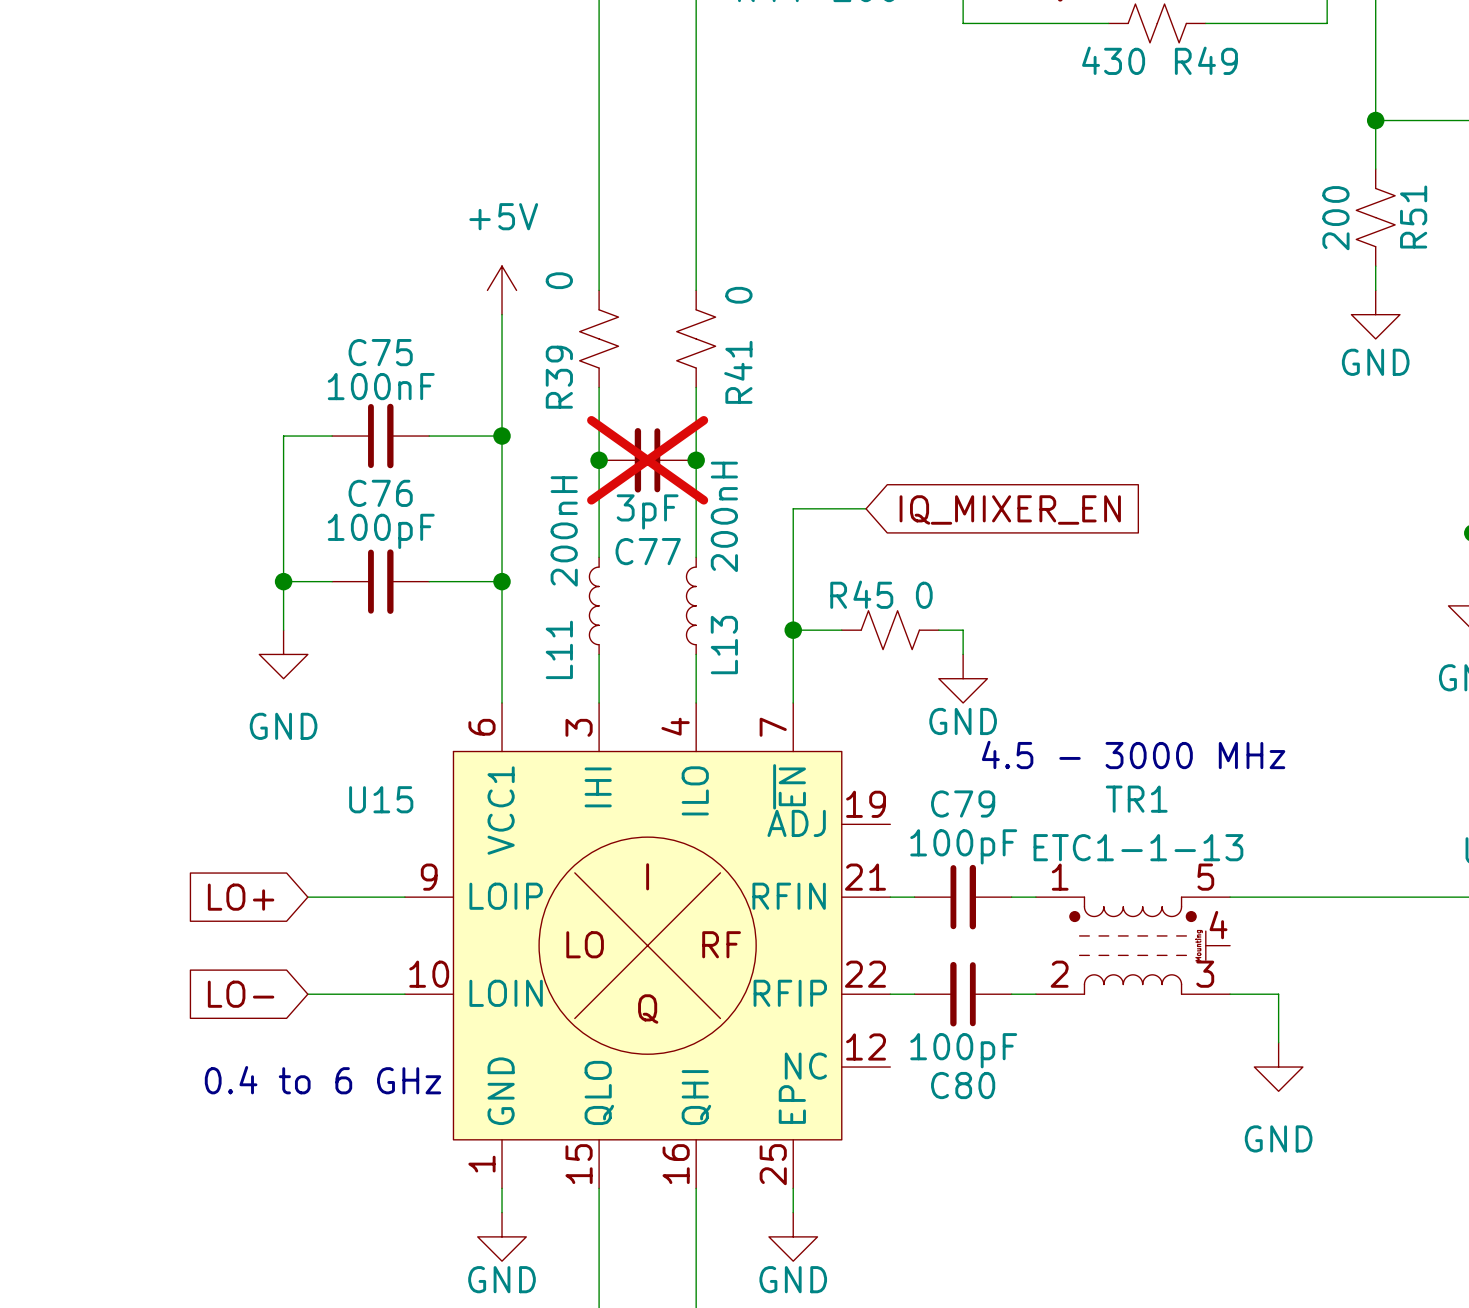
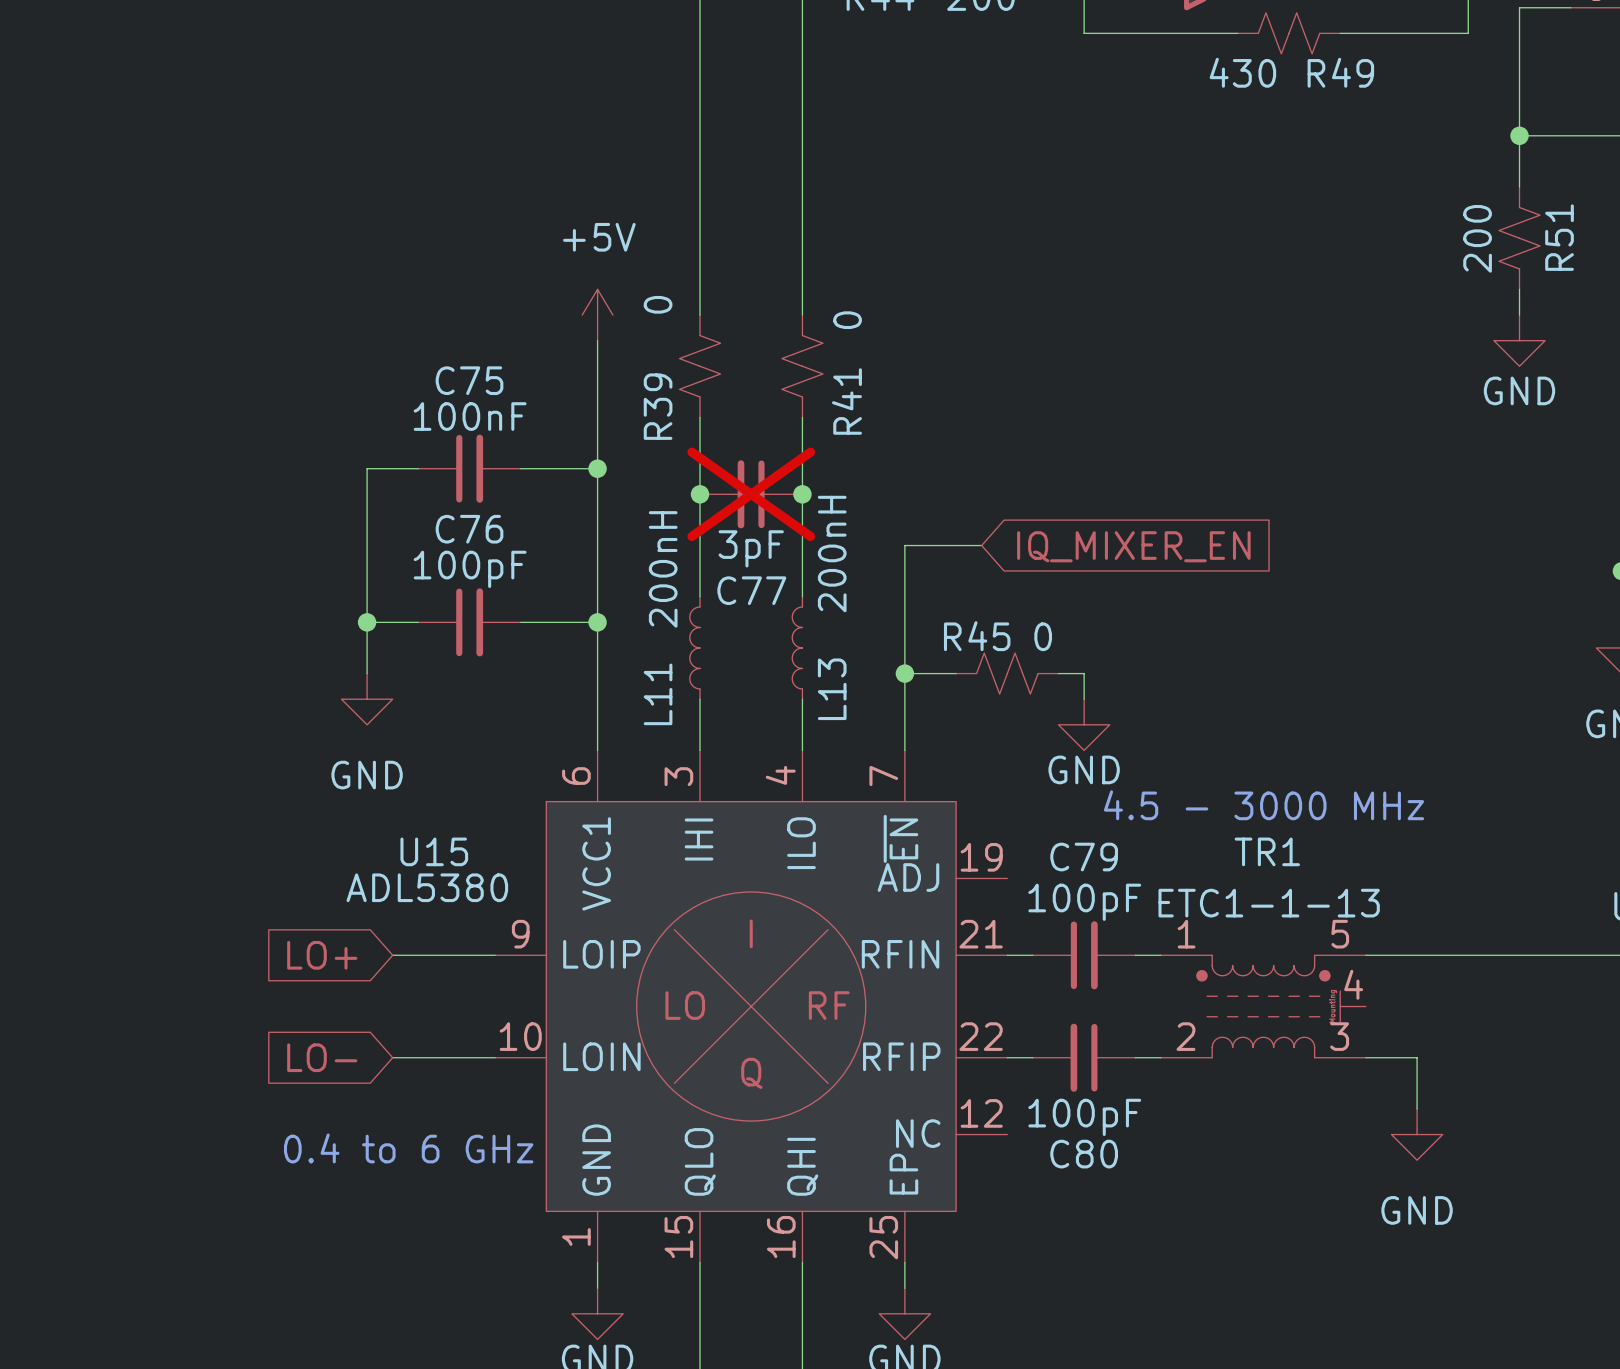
U15 name position: U15 (381, 799) -> U15 (434, 851)
U15 value: none -> ADL5380 (427, 887)

